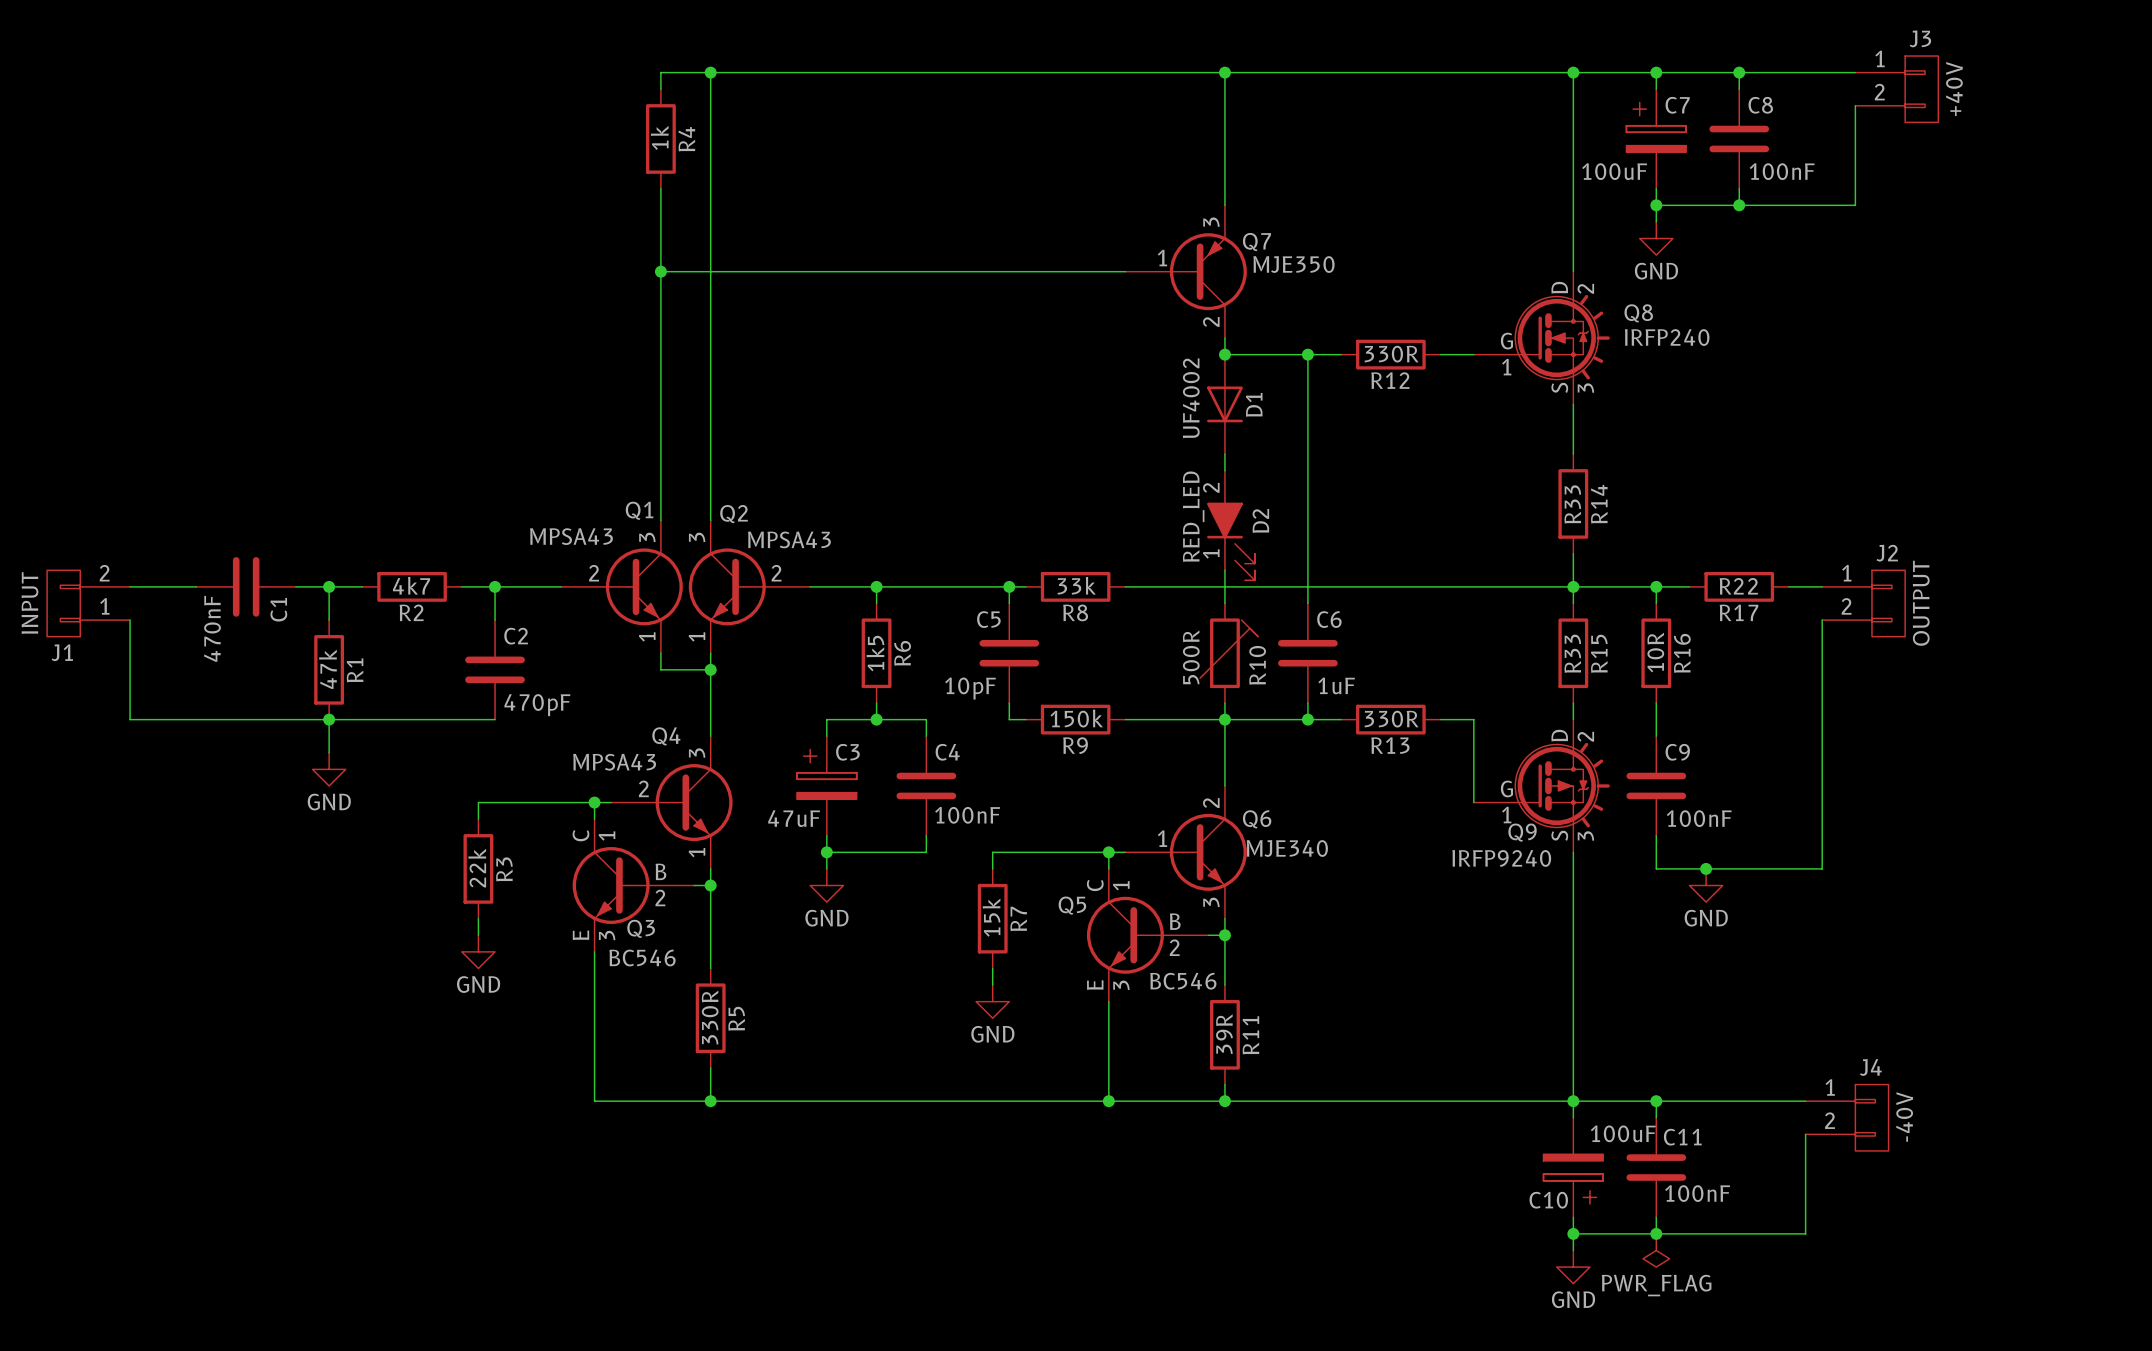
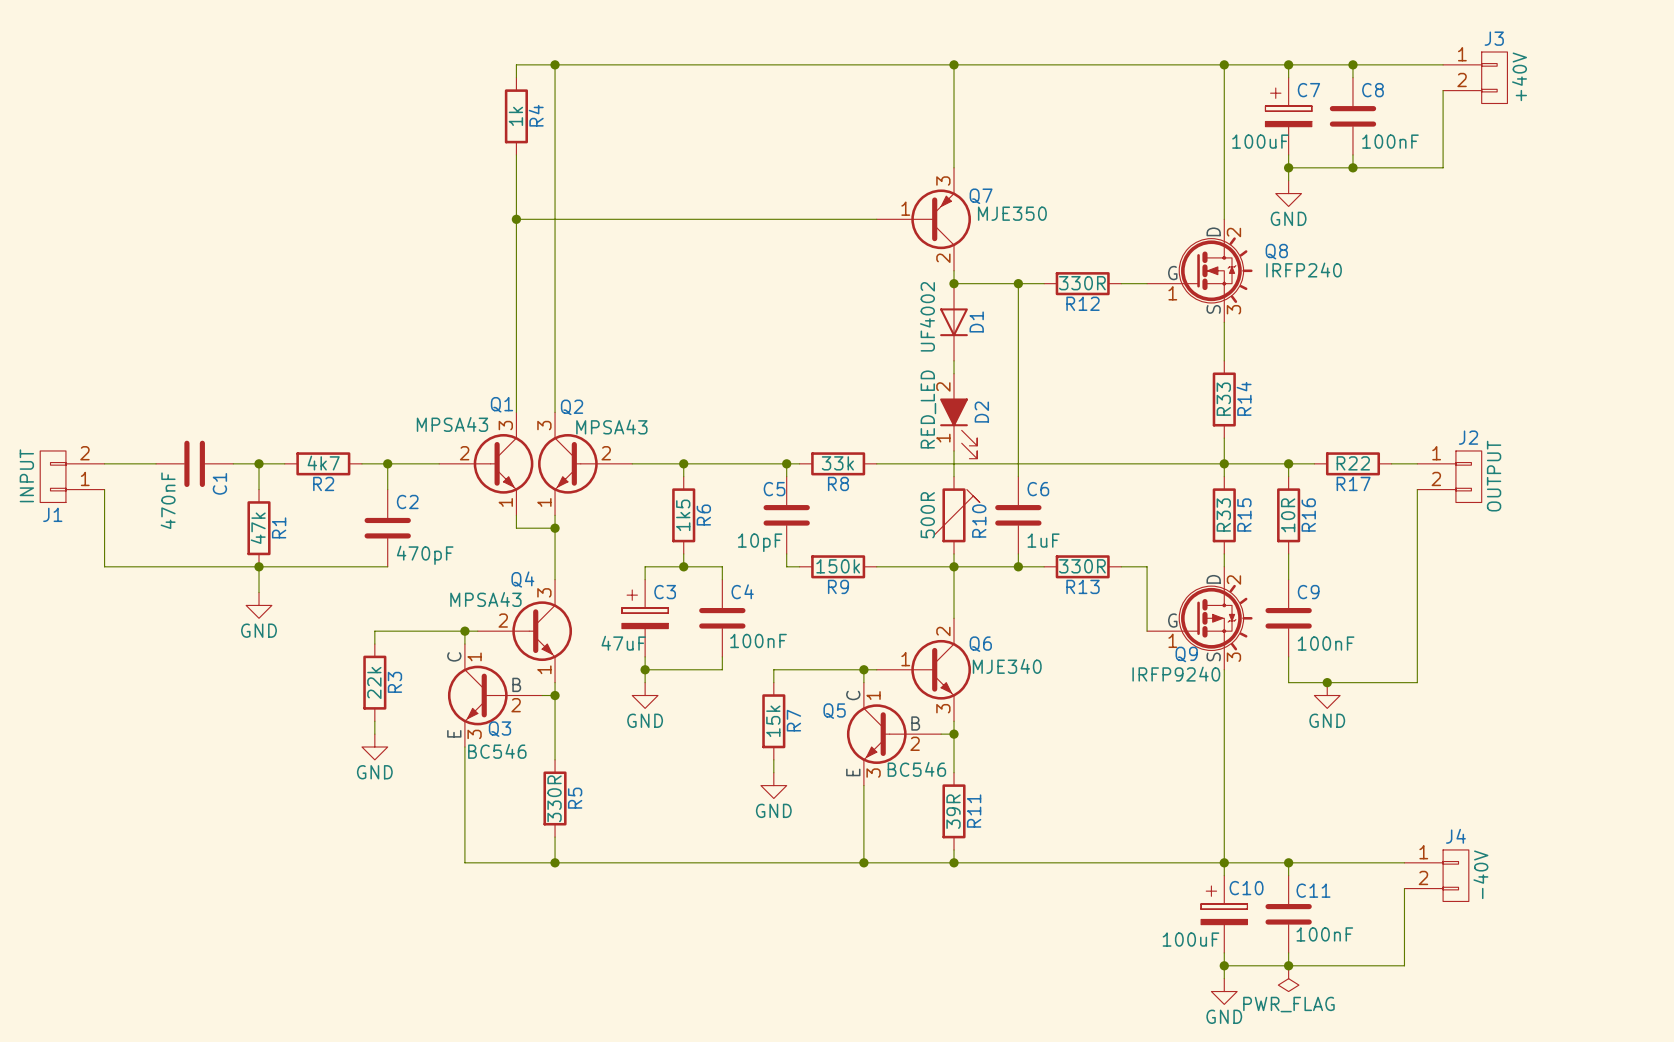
C10 rotation: 0° (1573, 1179) -> 180° (1224, 905)

